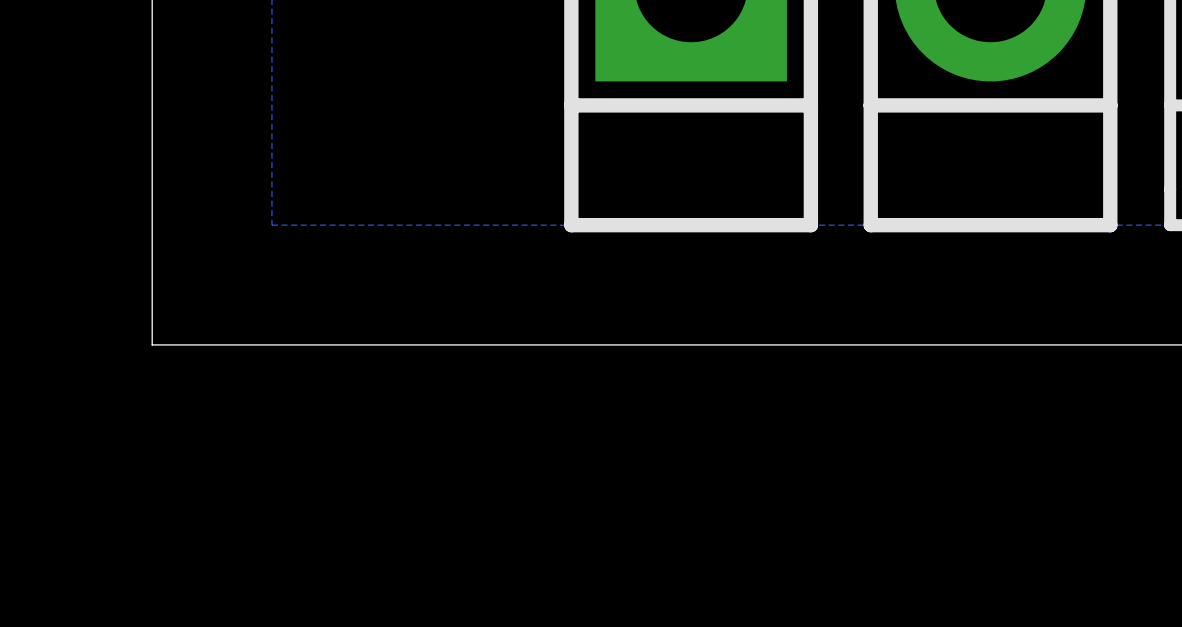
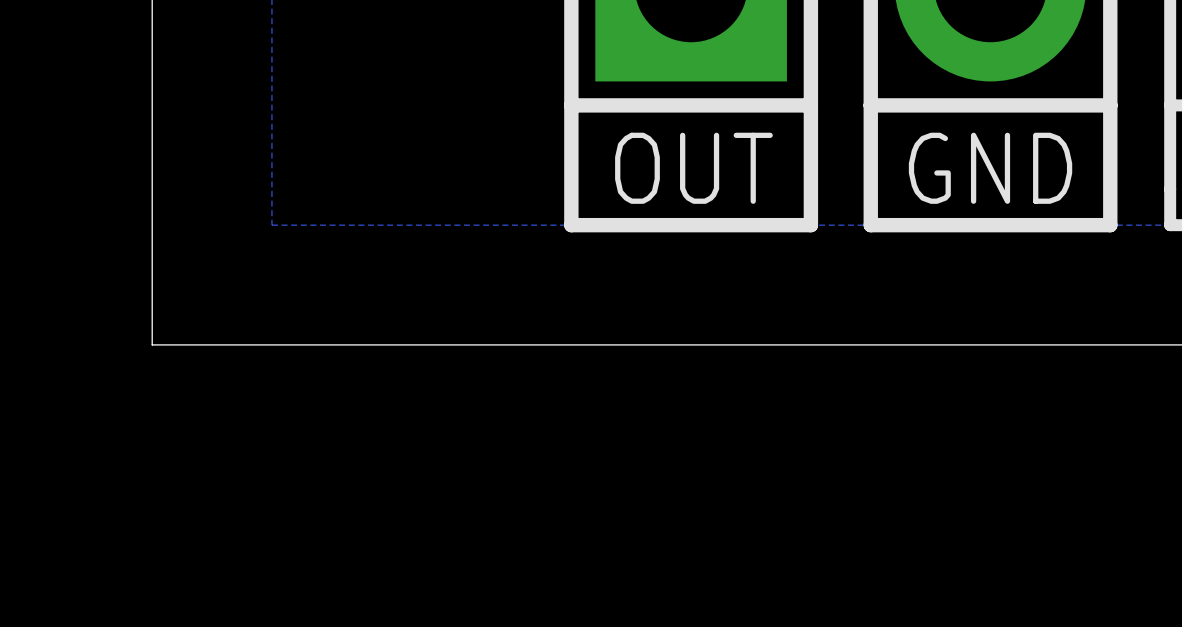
OUT name: none -> OUT (693, 168)
GND name: none -> GND (990, 168)

